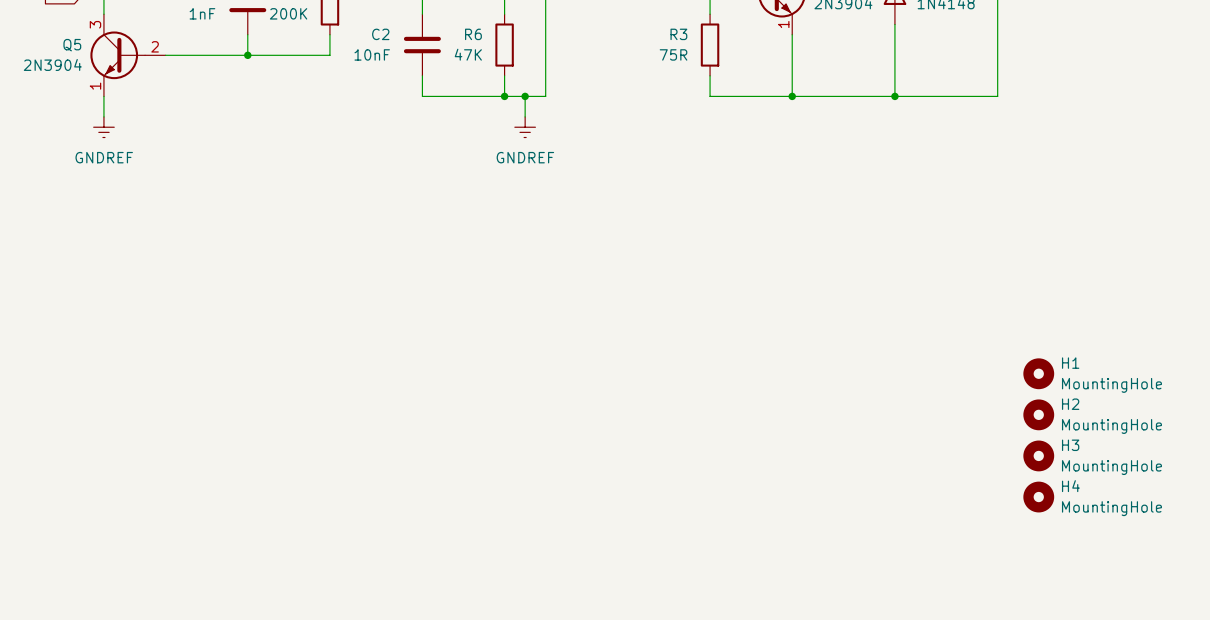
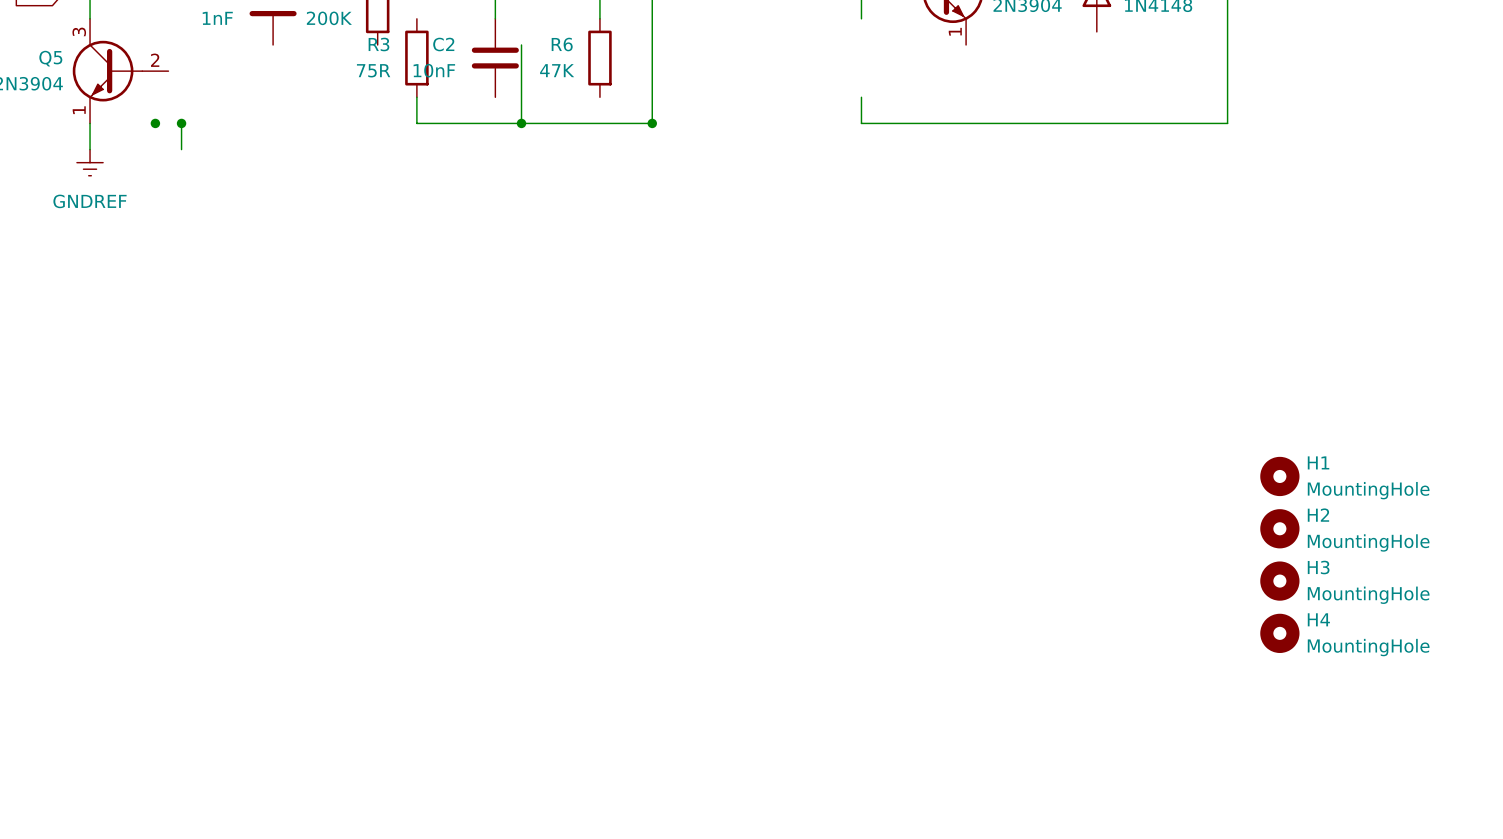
wire: (894, 24) (894, 96) -> none
wire: (247, 34) (247, 55) -> (181, 123) (181, 149)
wire: (329, 34) (329, 55) (165, 55) -> none
wire: none -> (521, 44) (521, 123)
wire: (792, 34) (792, 96) -> none
R3 position: (710, 45) -> (416, 58)
junction: (247, 55) -> none
wire: (422, 75) (422, 96) -> (416, 97) (416, 123) (495, 123)
wire: (504, 75) (504, 96) -> none
junction: none -> (155, 123)
junction: none -> (181, 123)
junction: none -> (521, 123)
junction: (504, 96) -> none
wire: (525, 96) (525, 116) -> none
junction: (525, 96) -> none
junction: none -> (652, 123)
junction: (792, 96) -> none
junction: (894, 96) -> none
power symbol: GNDREF (525, 127) -> none

